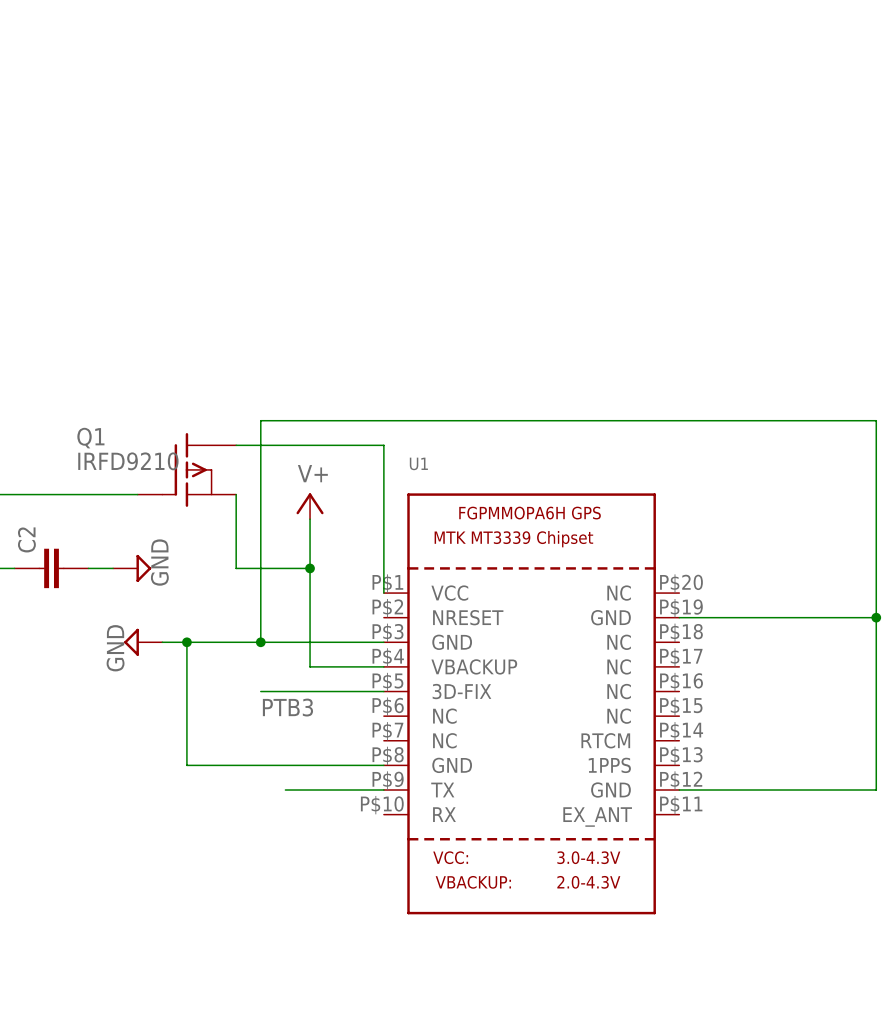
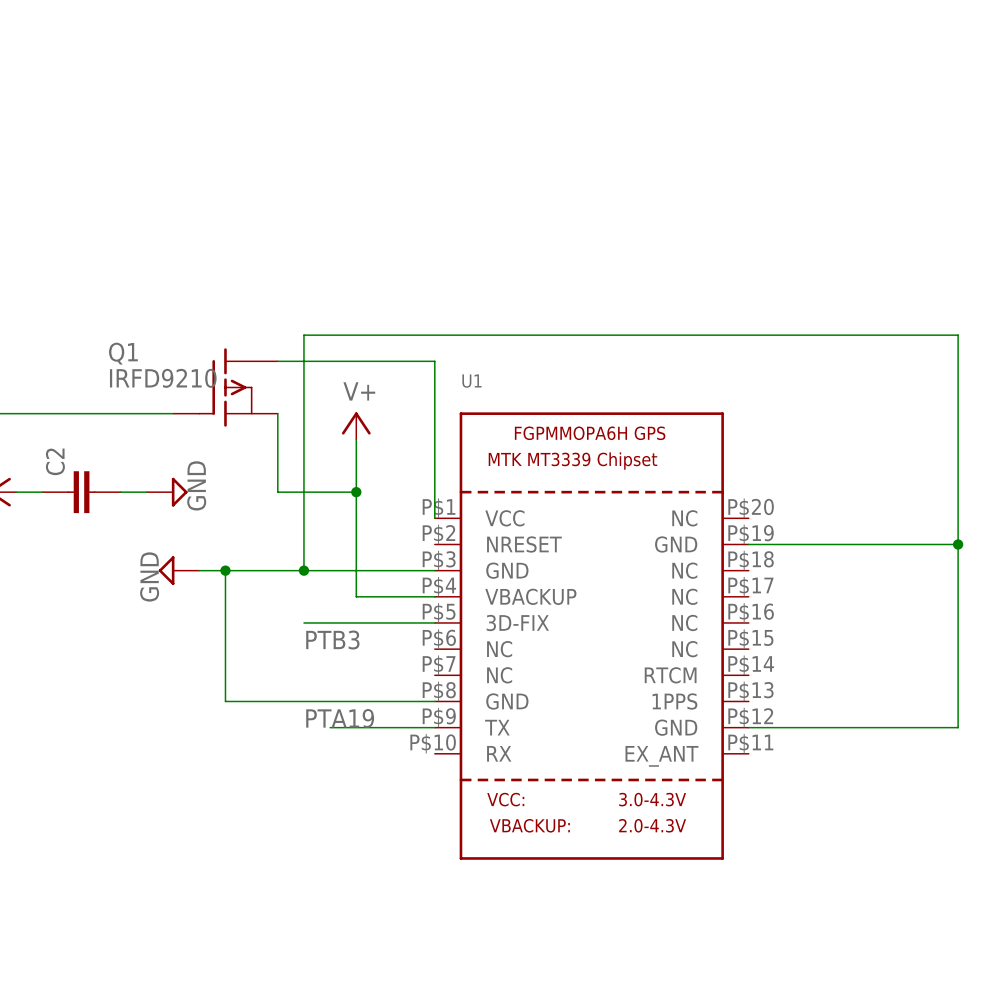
label: none -> PTA19 (340, 718)

